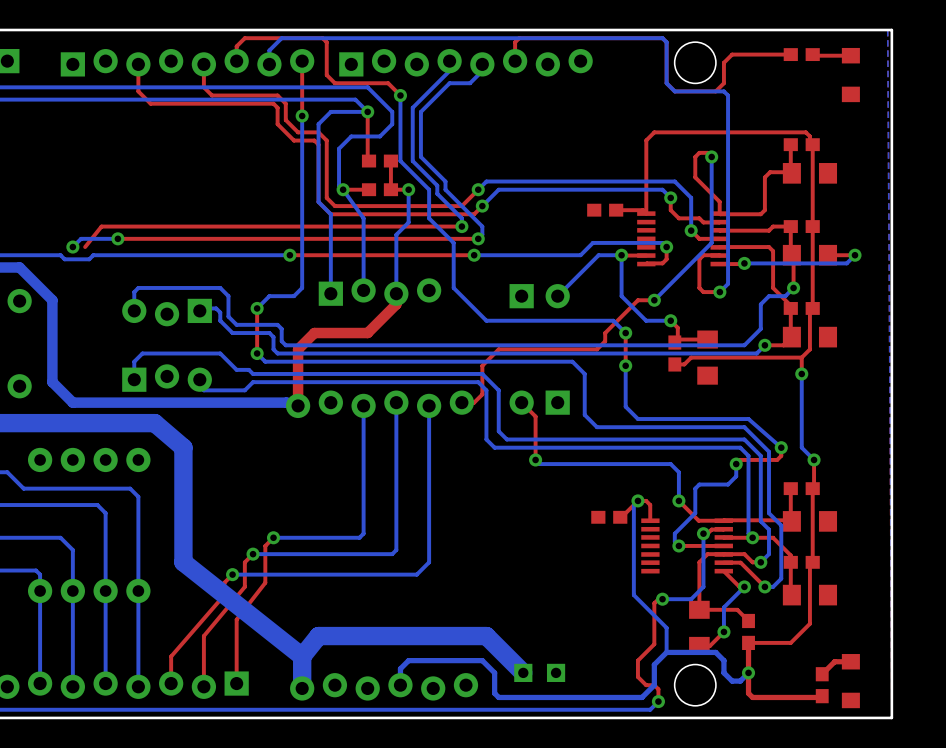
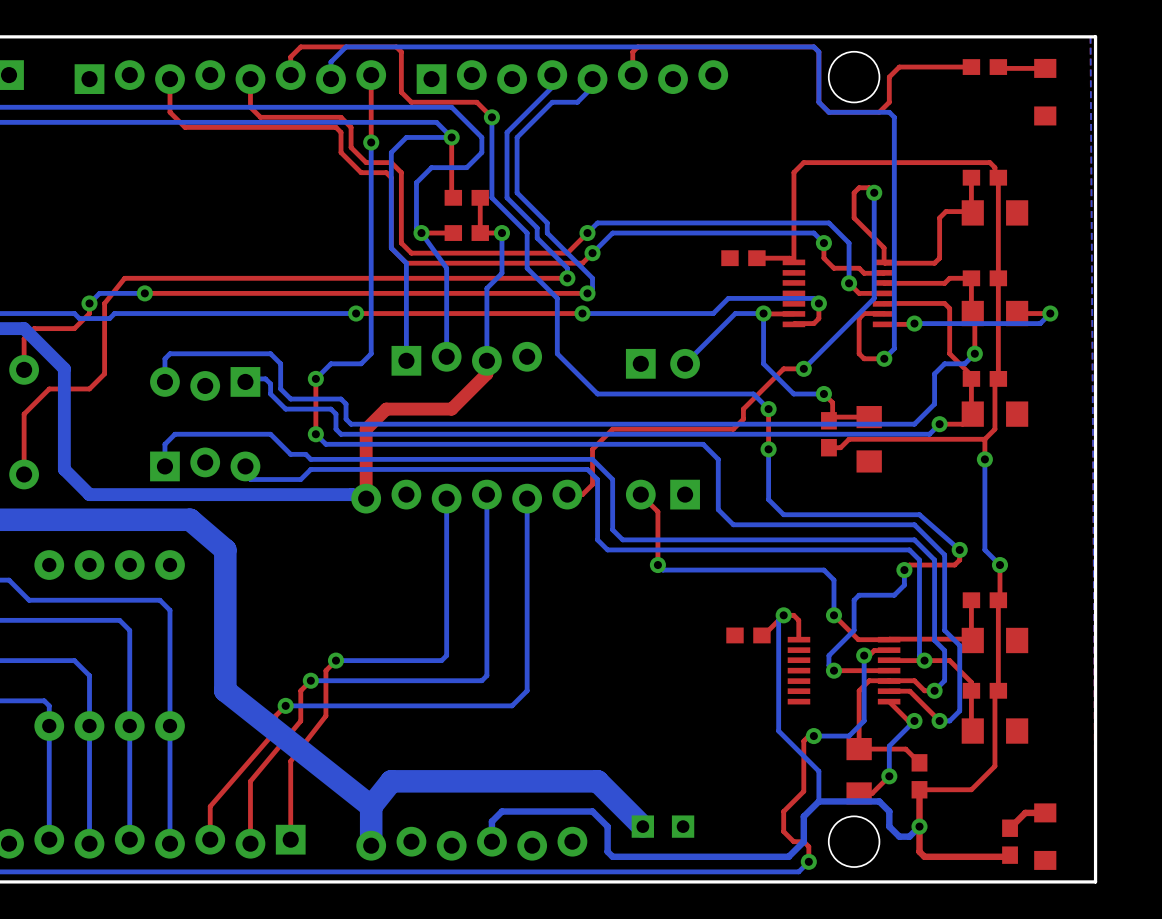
top track: none -> (89, 303) (89, 313) (74, 328) (34, 328) (24, 338) (24, 369)
top track: none -> (104, 303) (104, 373) (89, 388) (49, 388) (24, 414) (24, 474)

